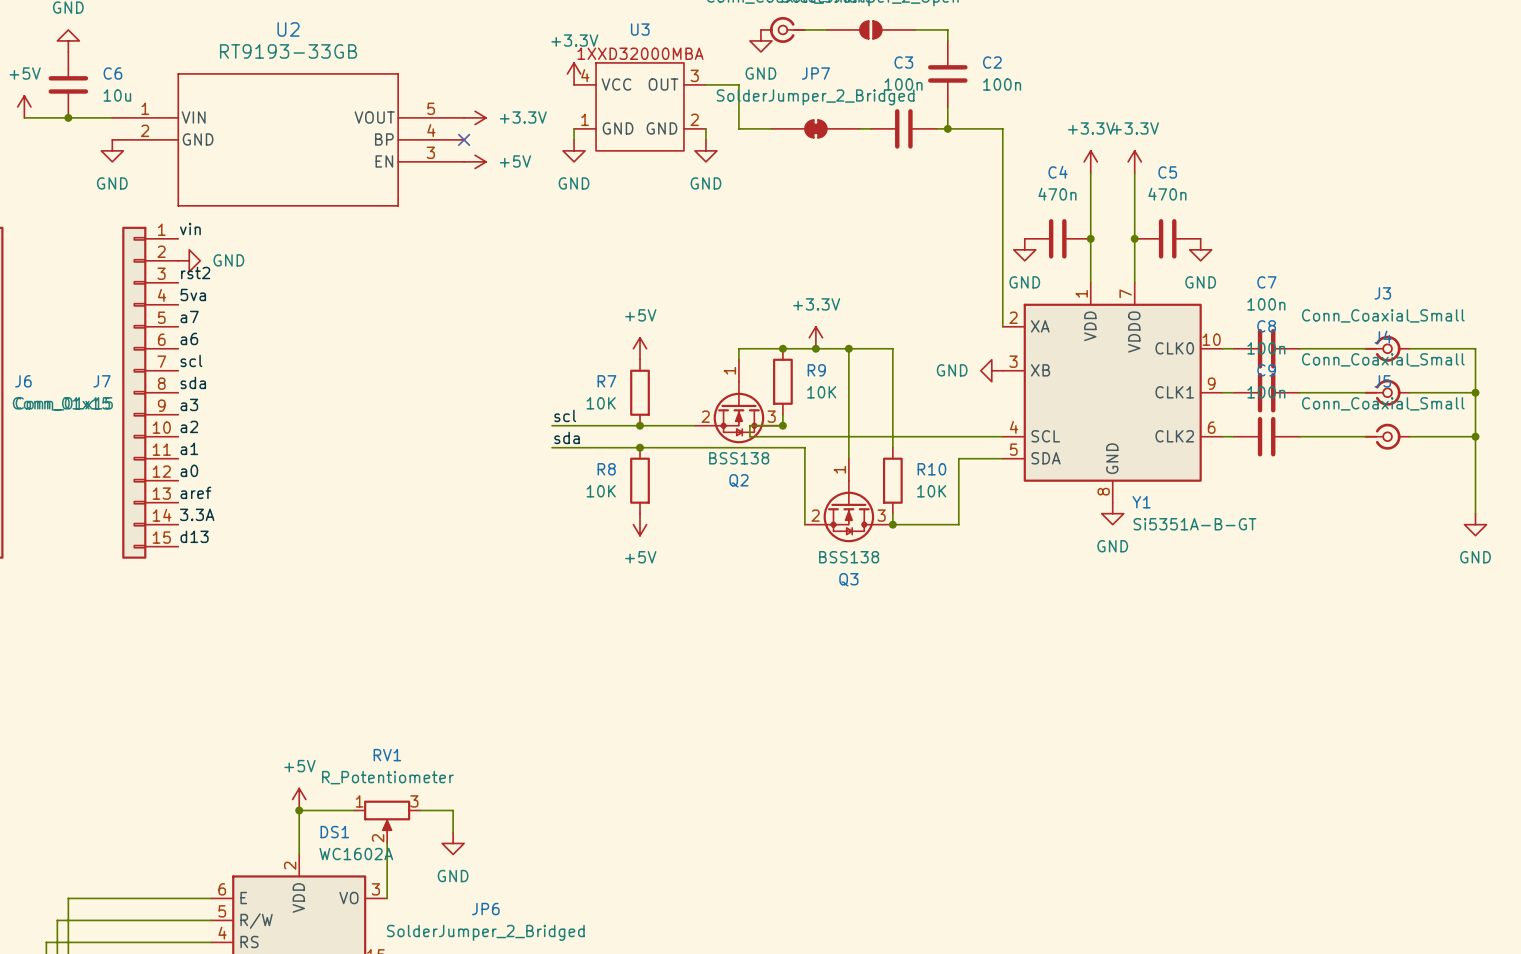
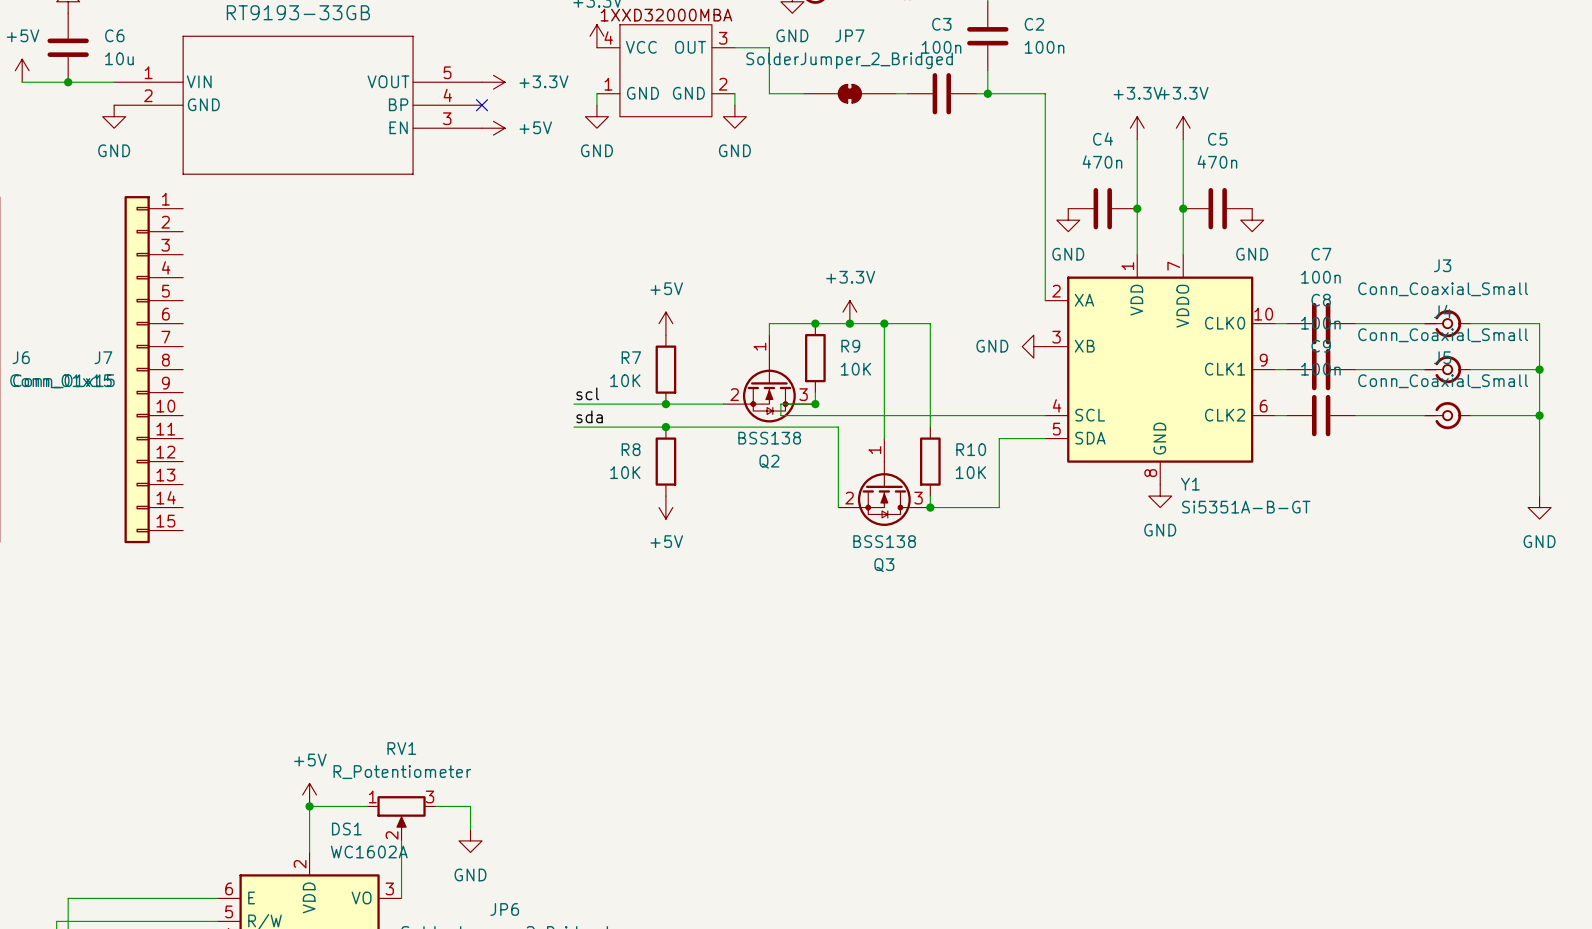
label: vin (190, 229) -> none
power symbol: GND (189, 260) -> none
label: rst2 (195, 272) -> none
label: 5va (193, 294) -> none
label: a7 (189, 316) -> none
label: a6 (189, 338) -> none
label: scl (191, 360) -> none
label: sda (193, 382) -> none
label: a3 (189, 404) -> none
label: a2 (189, 426) -> none
label: a1 (189, 448) -> none
label: a0 (189, 470) -> none
label: aref (195, 492) -> none
label: 3.3A (197, 514) -> none
label: d13 (194, 536) -> none

